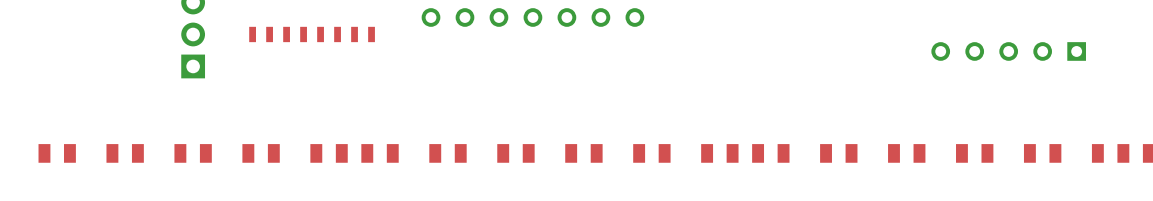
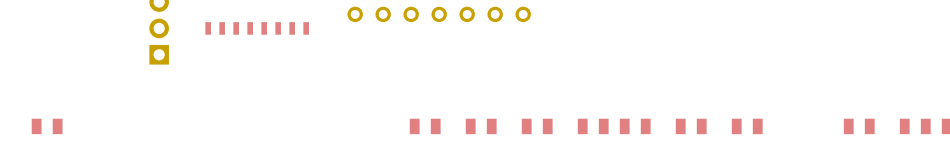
part: (1008, 51) -> none
part: (125, 153) -> none
part: (193, 153) -> none
part: (261, 153) -> none
part: (329, 153) -> none
part: (380, 153) -> none
part: (447, 153) -> none
part: (974, 153) -> none

